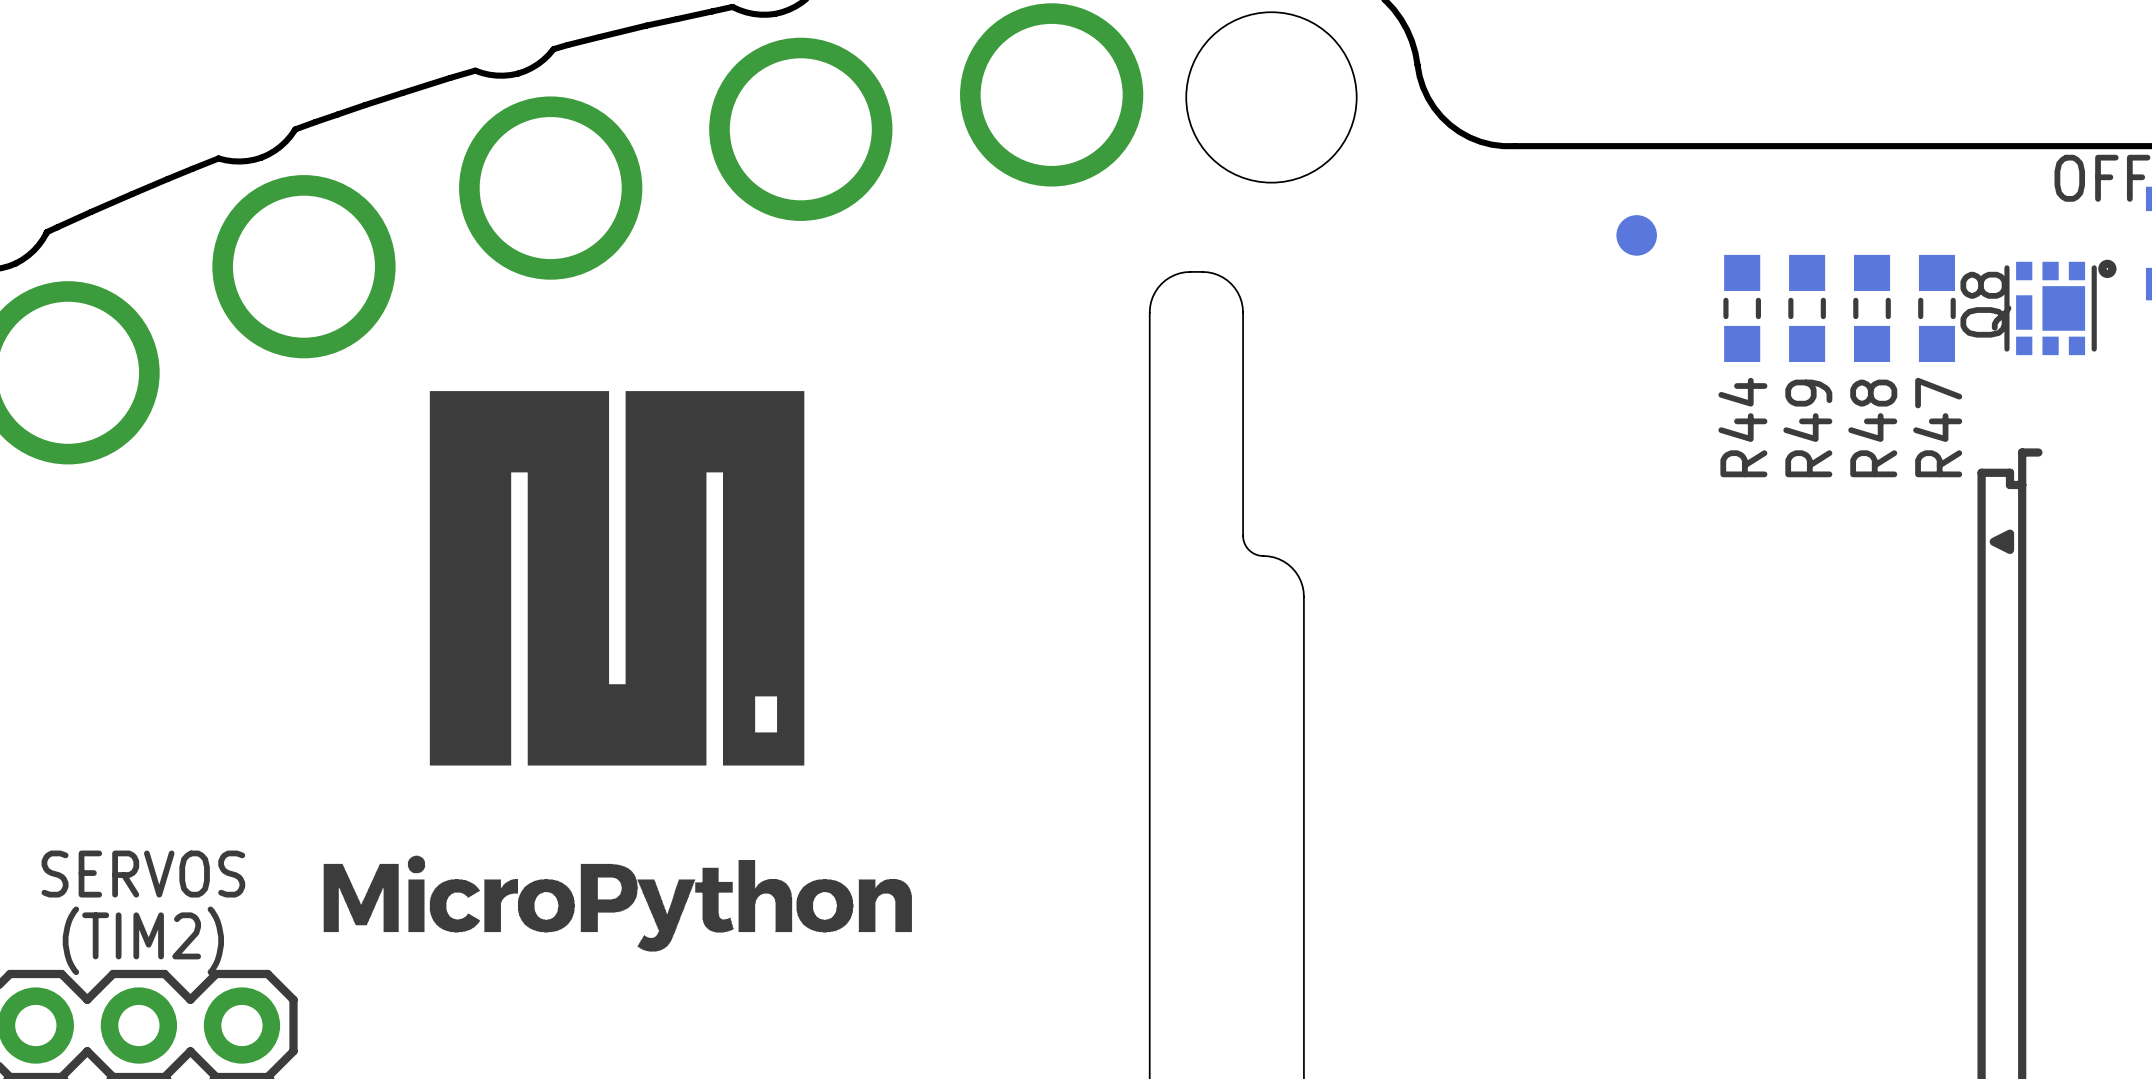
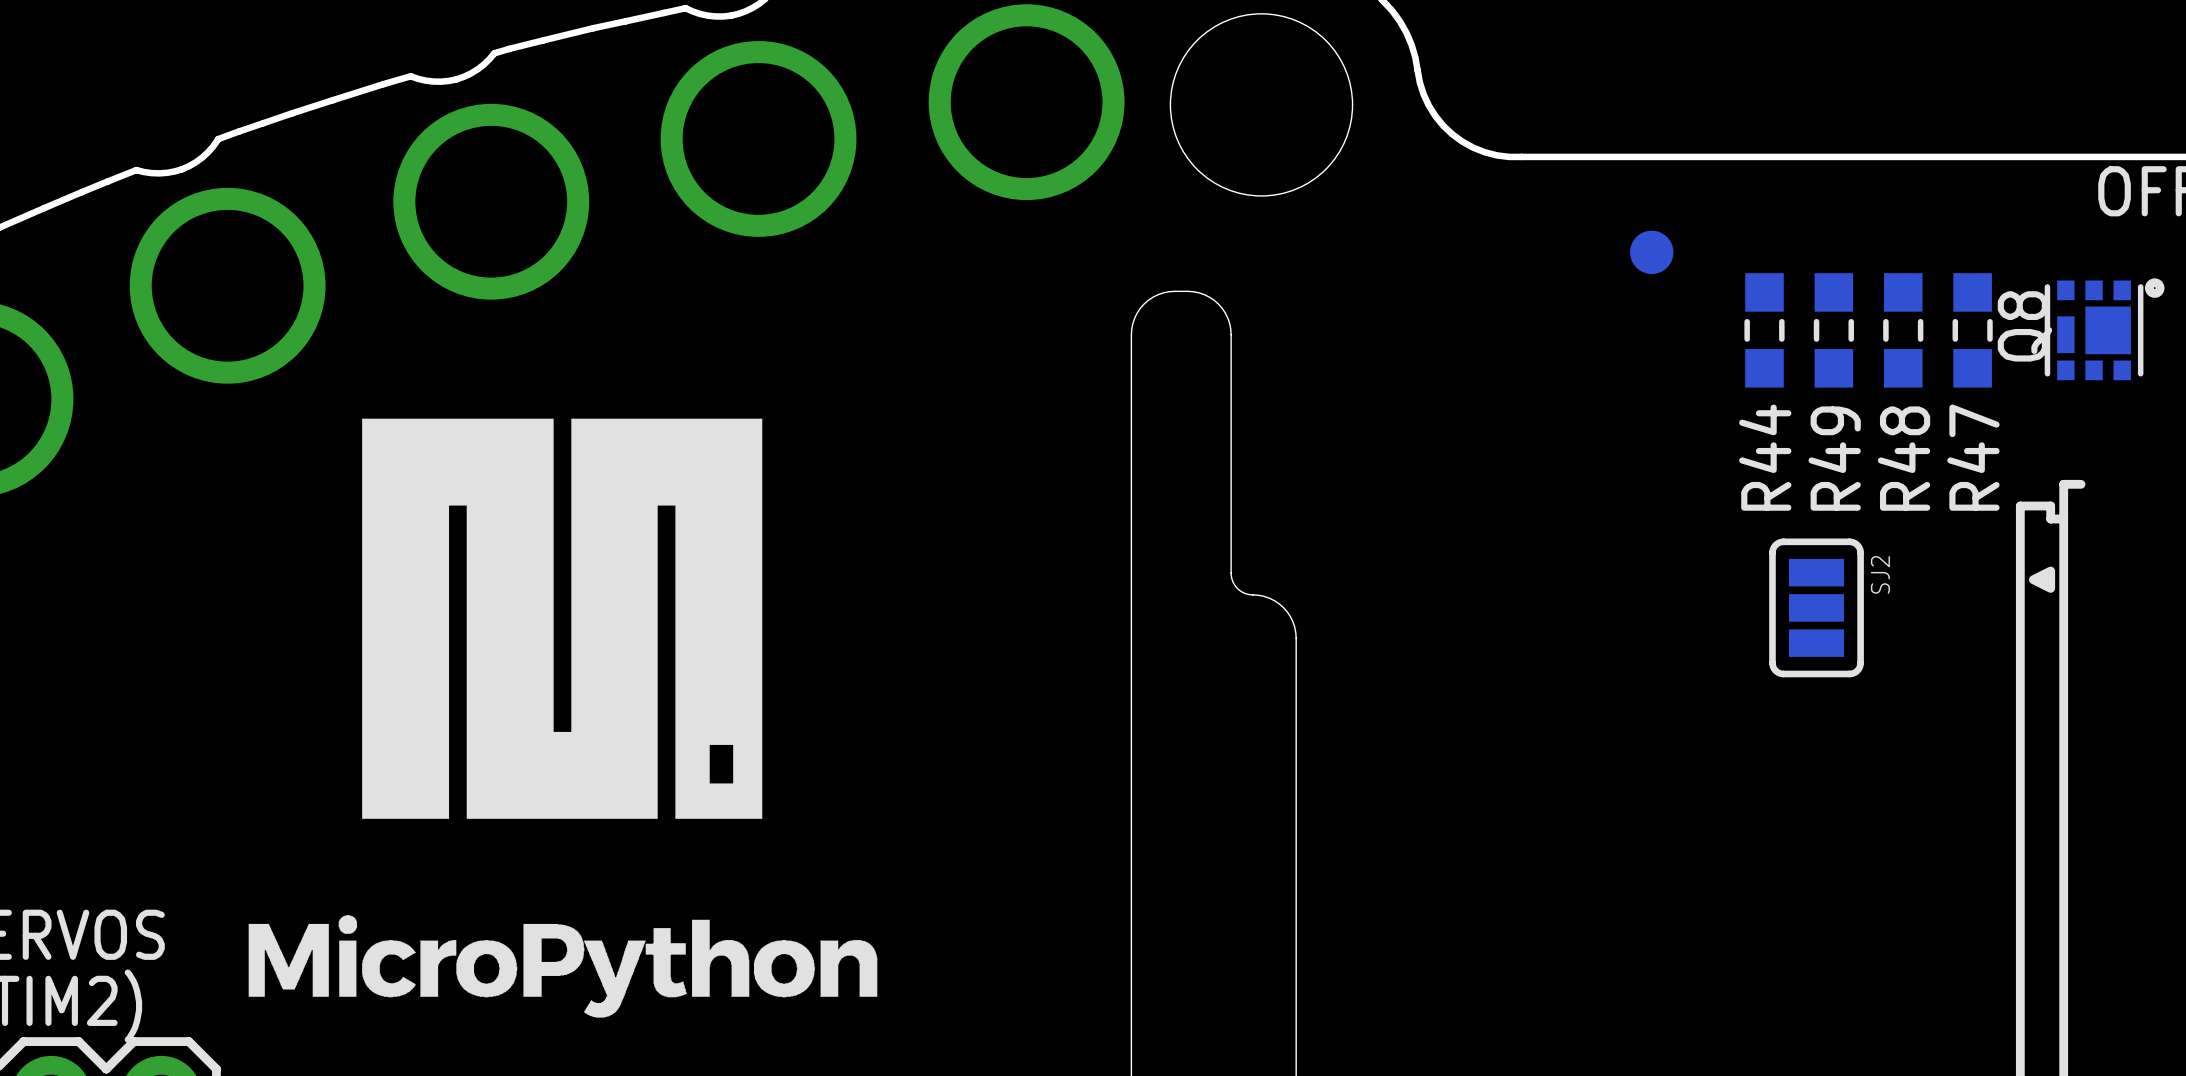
SJ2: none -> (1816, 607)

